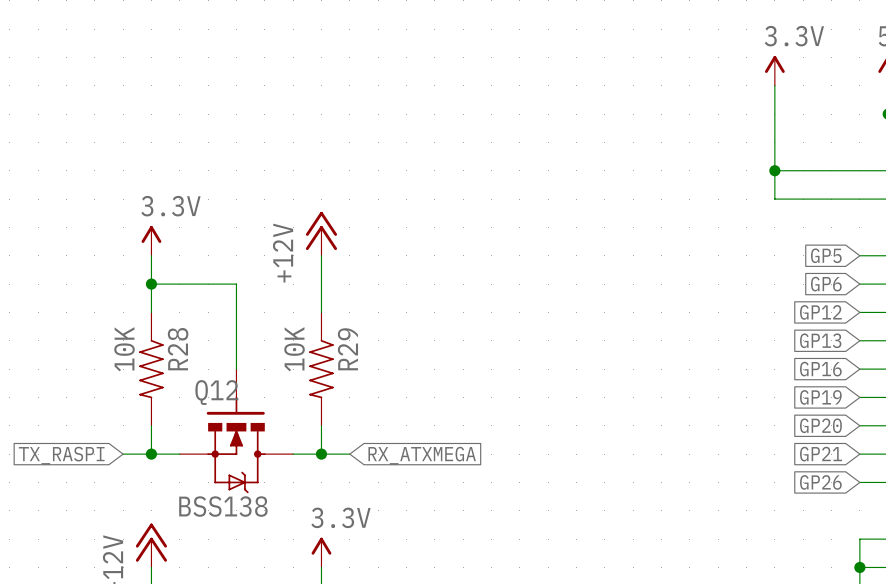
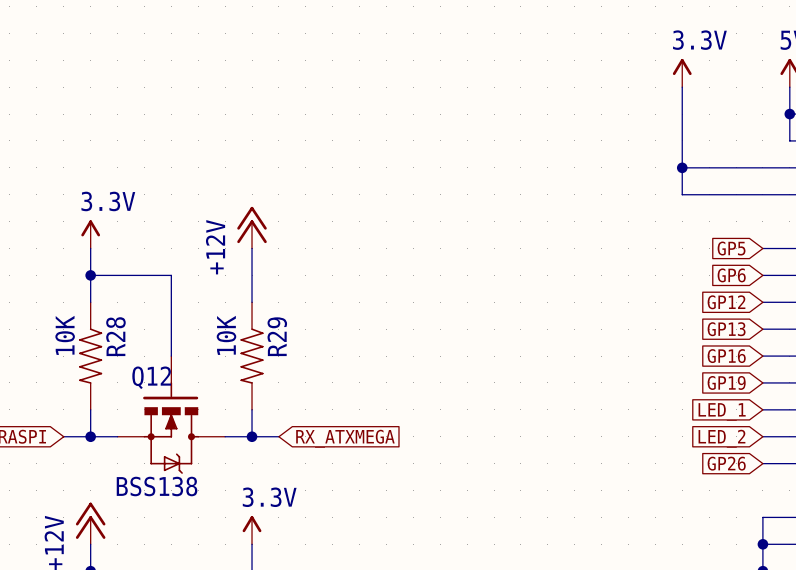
global label: GP20 (820, 425) -> LED_1 (722, 412)
global label: GP21 (821, 454) -> LED_2 (721, 438)

